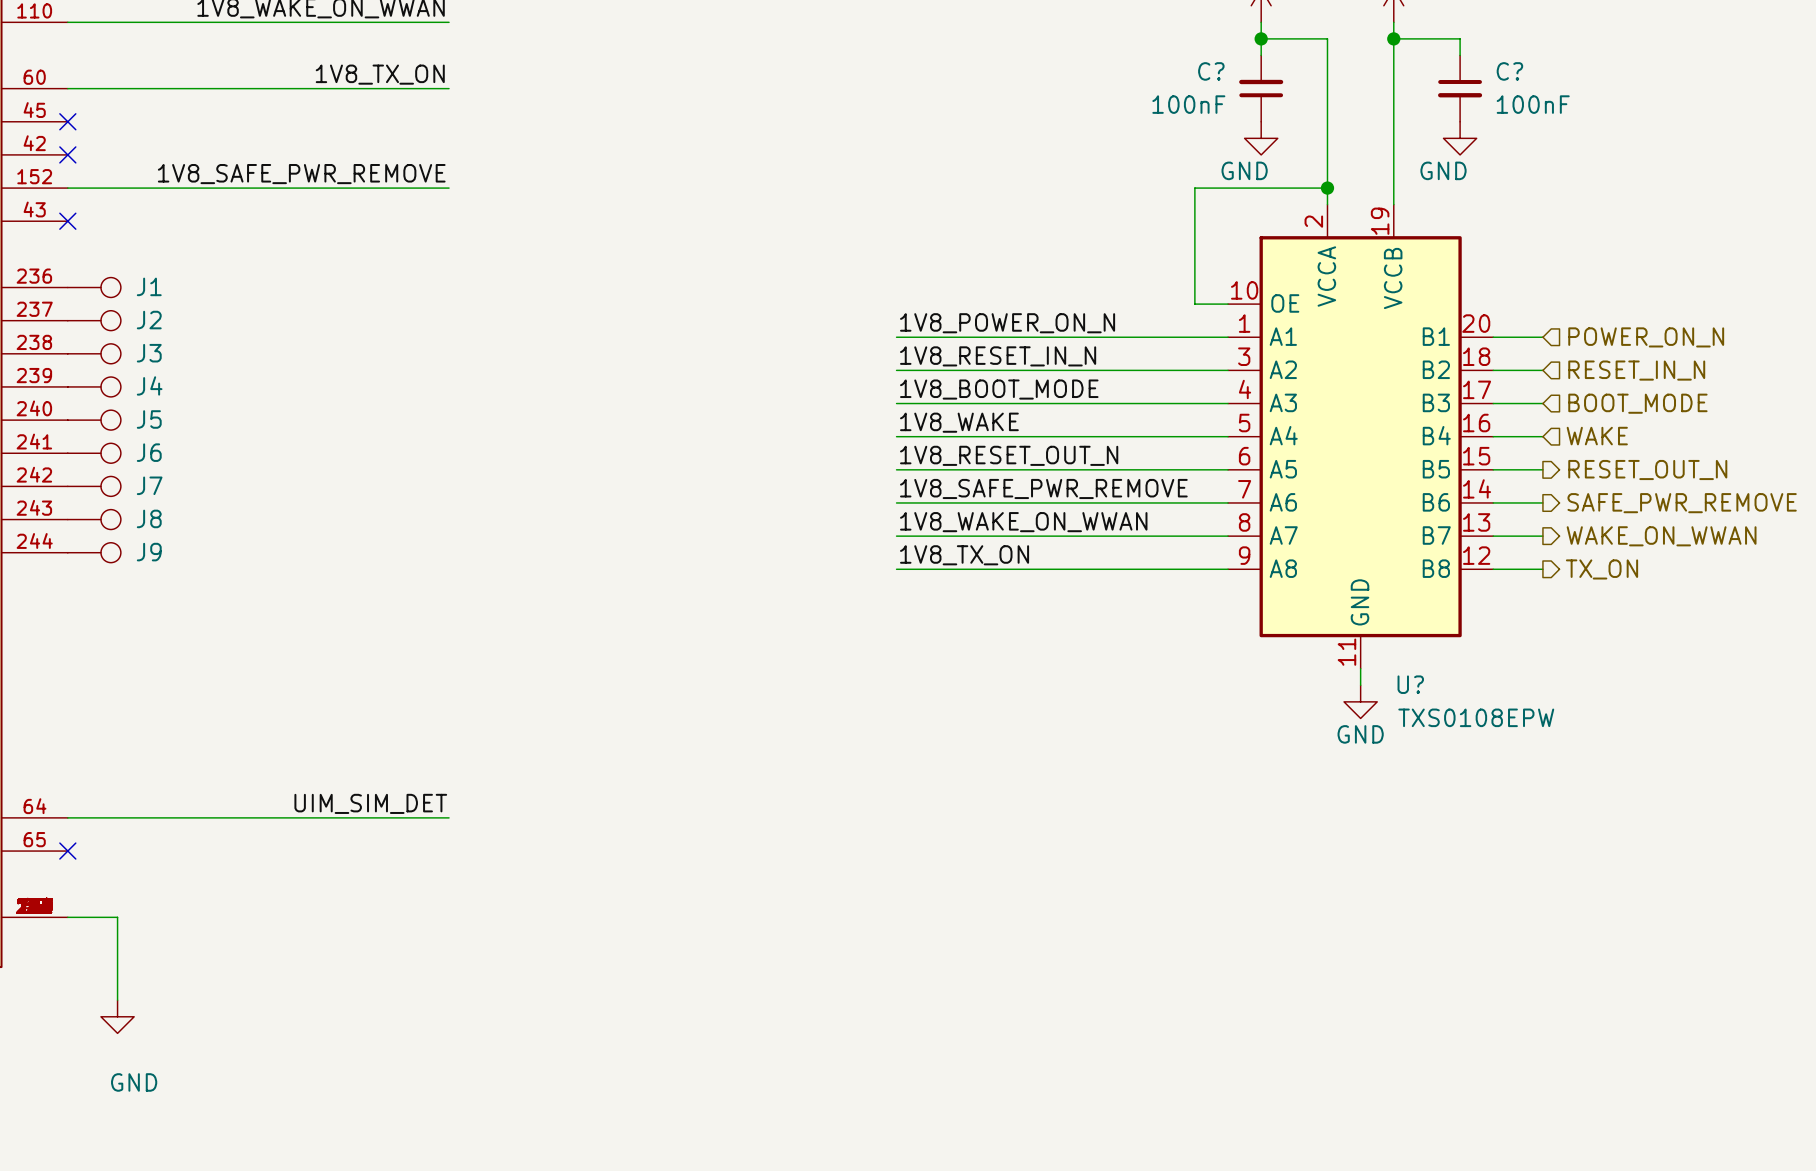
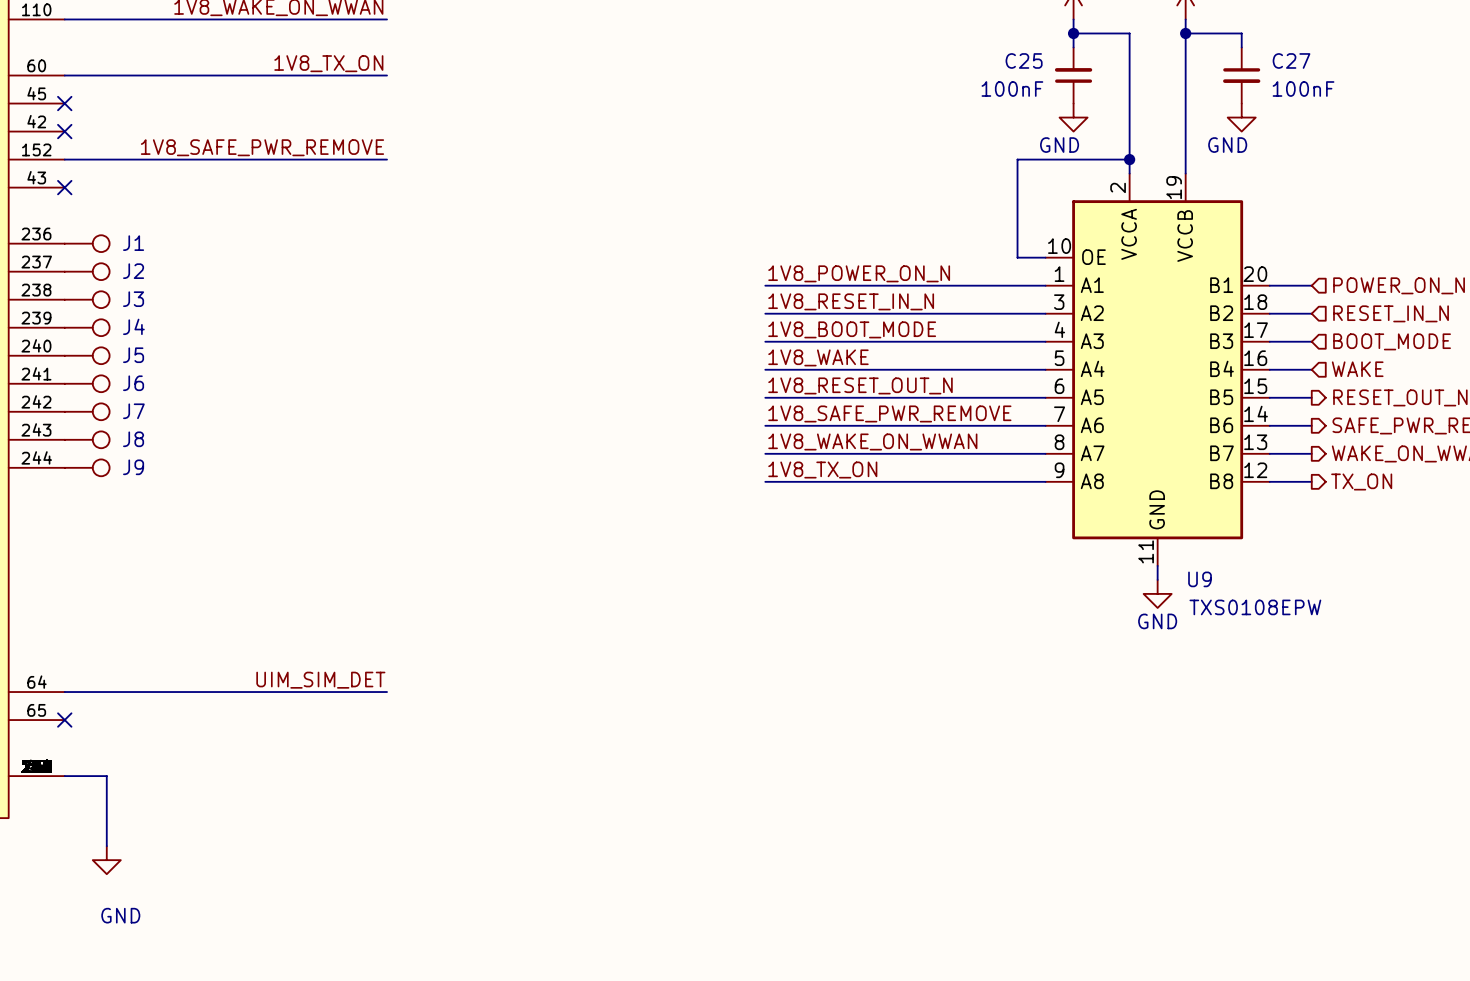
C? name: C? (1211, 71) -> C25 (1024, 60)
C? name: C? (1509, 71) -> C27 (1291, 60)
U? name: U? (1410, 684) -> U9 (1200, 579)

